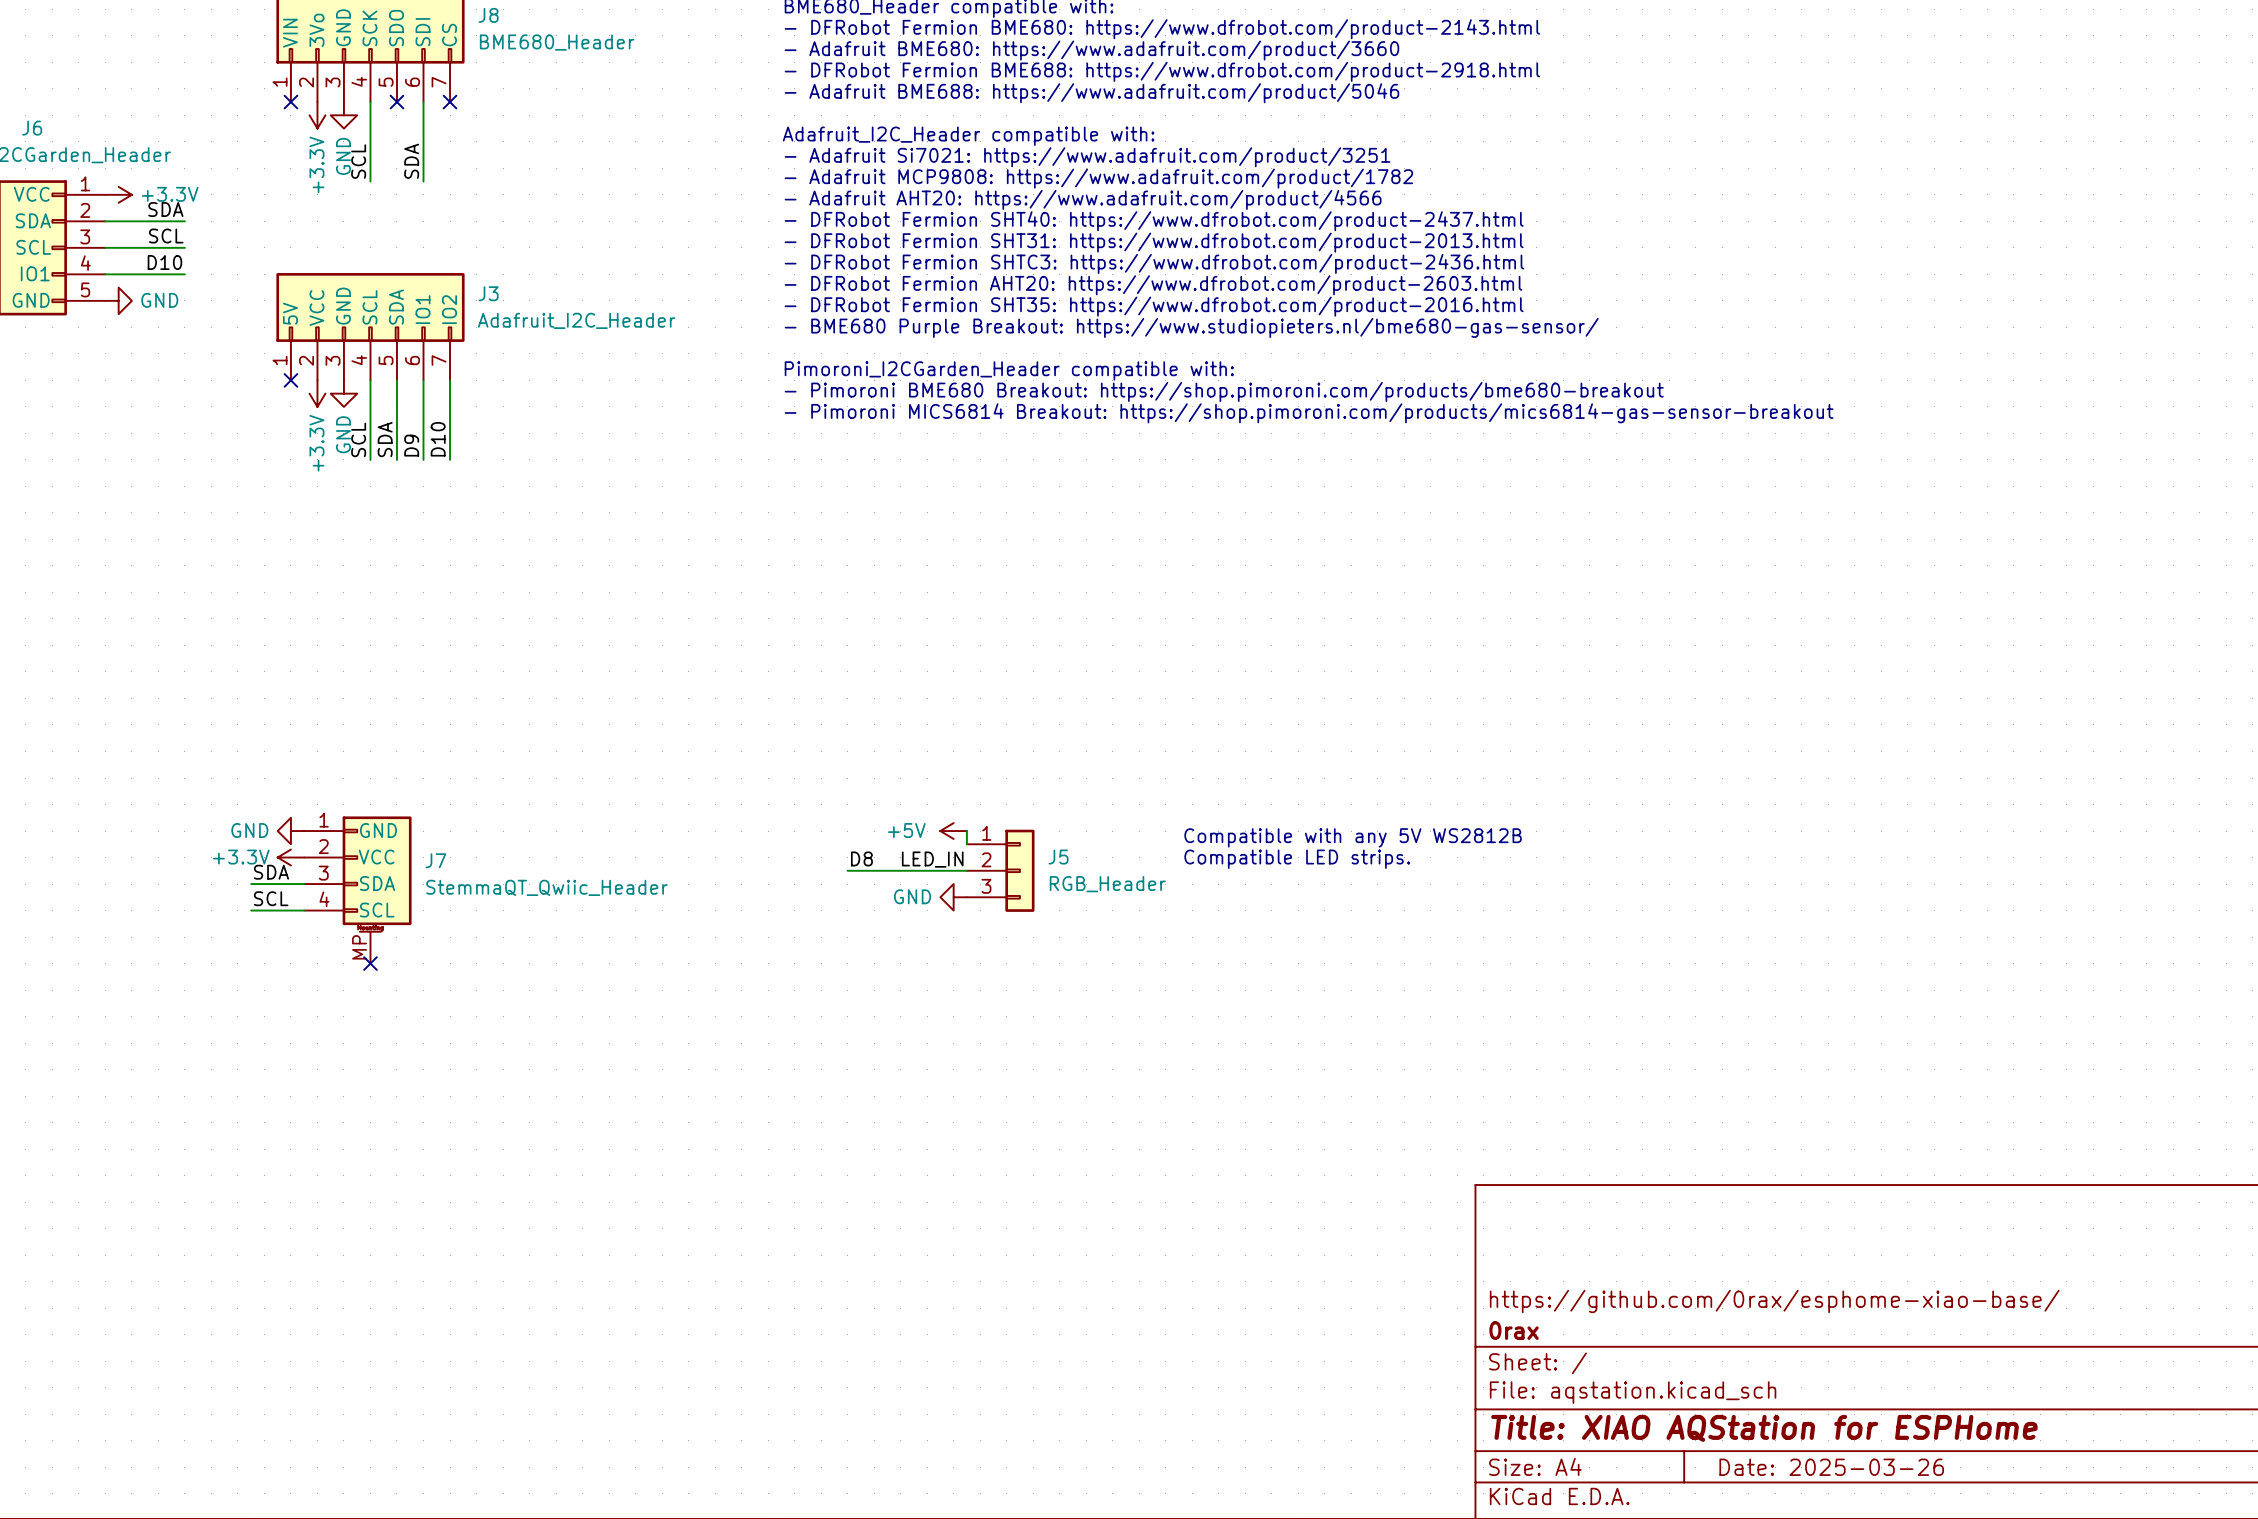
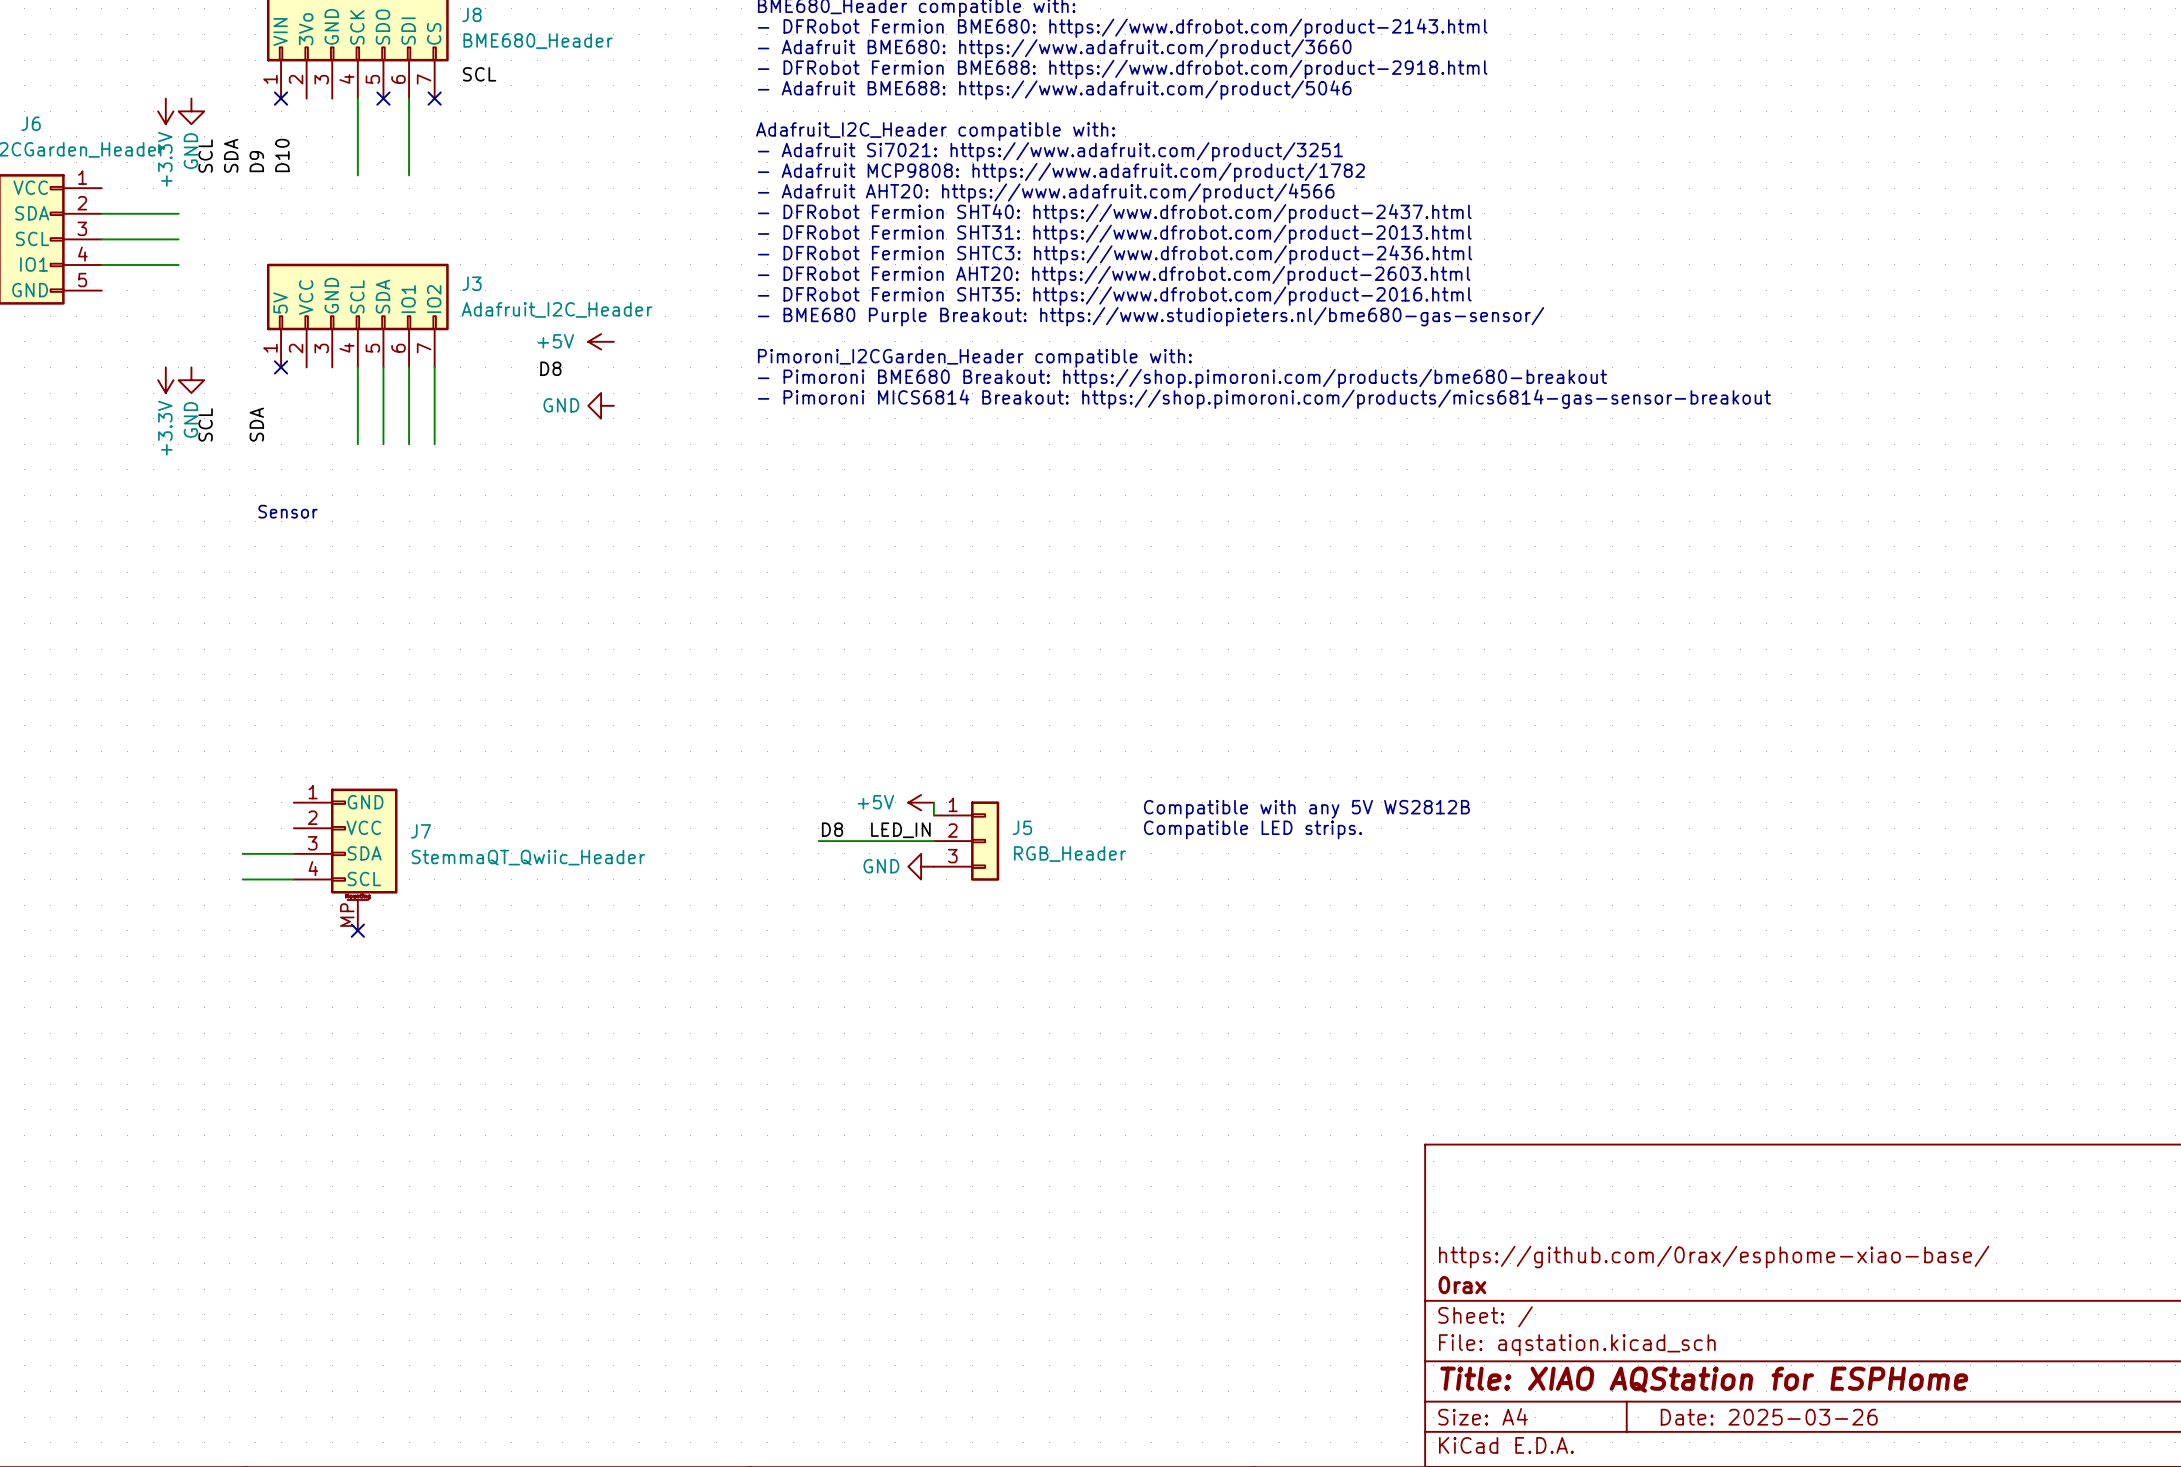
label: none -> SCL (479, 74)
power symbol: none -> +3.3V (165, 111)
power symbol: none -> GND (191, 111)
power symbol: +3.3V (317, 115) -> none
power symbol: GND (343, 115) -> none
label: SCL (358, 161) -> none
label: SDA (411, 161) -> none
label: none -> D9 (256, 161)
power symbol: +3.3V (118, 194) -> none
label rotation: 0° (165, 209) -> 90° counterclockwise (231, 155)
label position: SDA (165, 209) -> SDA (231, 155)
label rotation: 0° (166, 236) -> 90° counterclockwise (205, 156)
label position: SCL (166, 236) -> SCL (205, 156)
label rotation: 0° (164, 262) -> 90° counterclockwise (282, 155)
label position: D10 (164, 262) -> D10 (282, 155)
power symbol: GND (118, 300) -> none
power symbol: none -> +5V (601, 341)
label: none -> D8 (550, 368)
power symbol: none -> +3.3V (165, 380)
power symbol: none -> GND (191, 380)
power symbol: +3.3V (317, 393) -> none
power symbol: GND (343, 393) -> none
power symbol: none -> GND (601, 405)
label: none -> SCL (205, 424)
label: SCL (358, 439) -> none
label position: SDA (385, 439) -> SDA (256, 424)
label: D10 (438, 439) -> none
label: D9 (411, 445) -> none
text: none -> Sensor (288, 511)
power symbol: GND (290, 831) -> none
power symbol: +3.3V (290, 857) -> none
label: SDA (271, 872) -> none
label: SCL (271, 898) -> none

